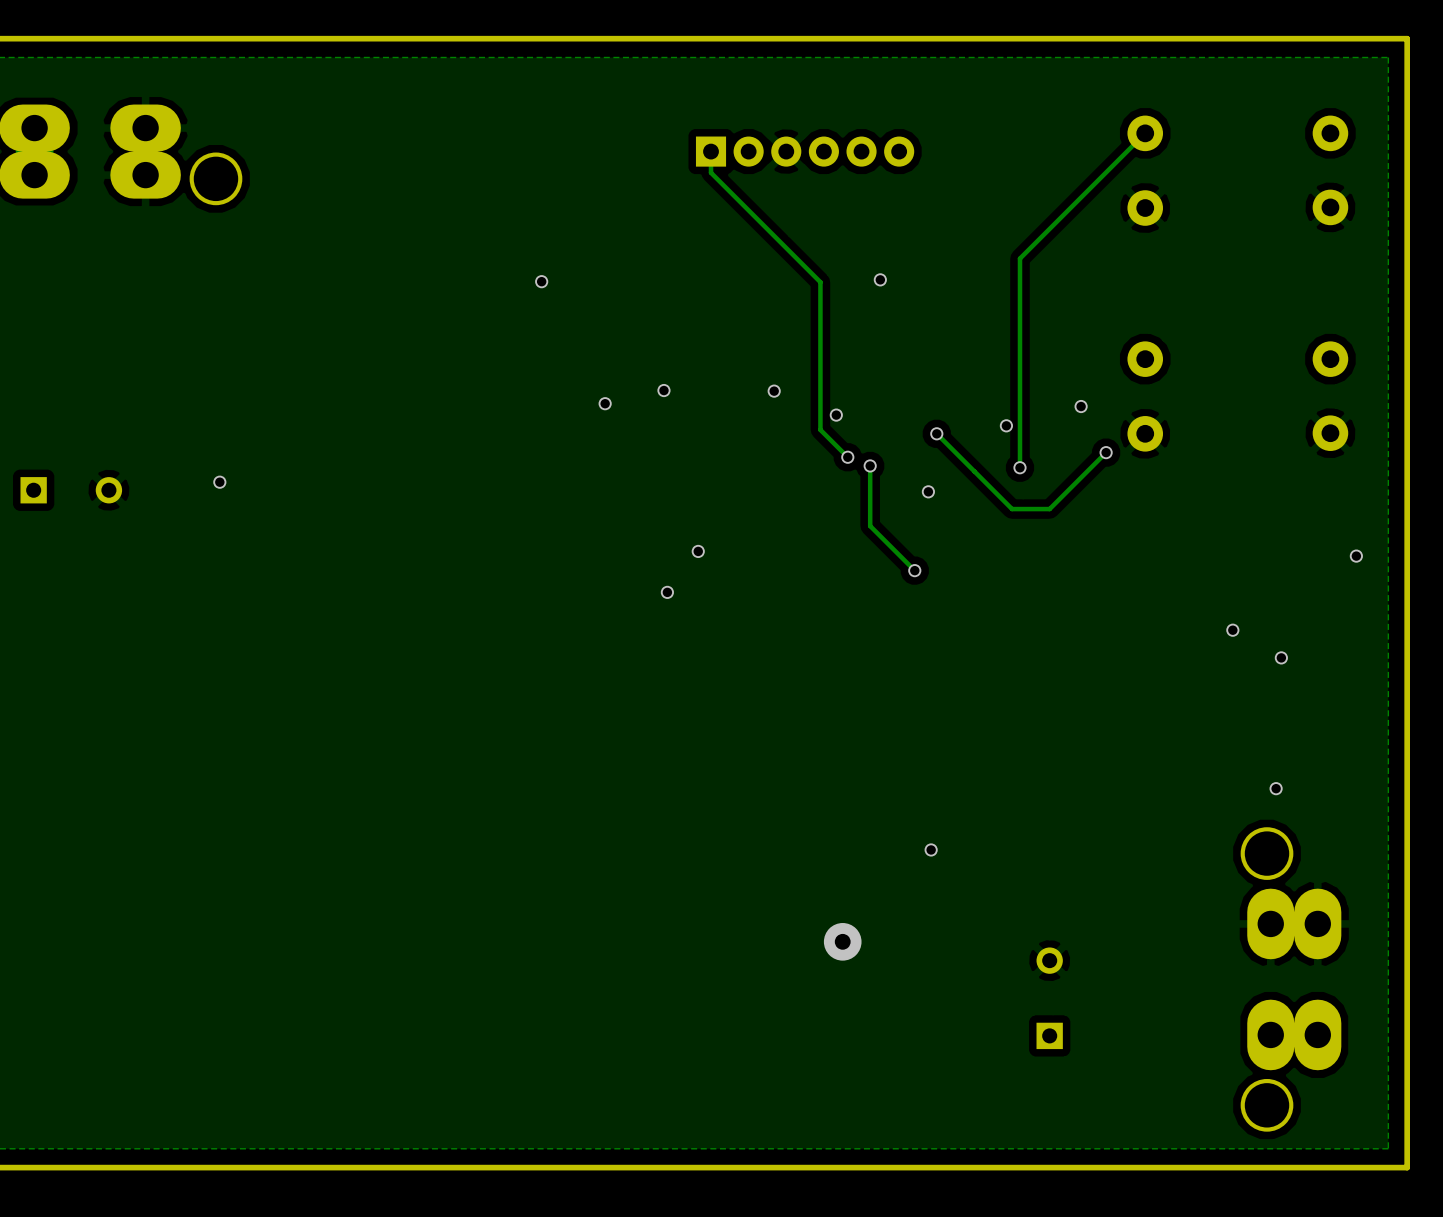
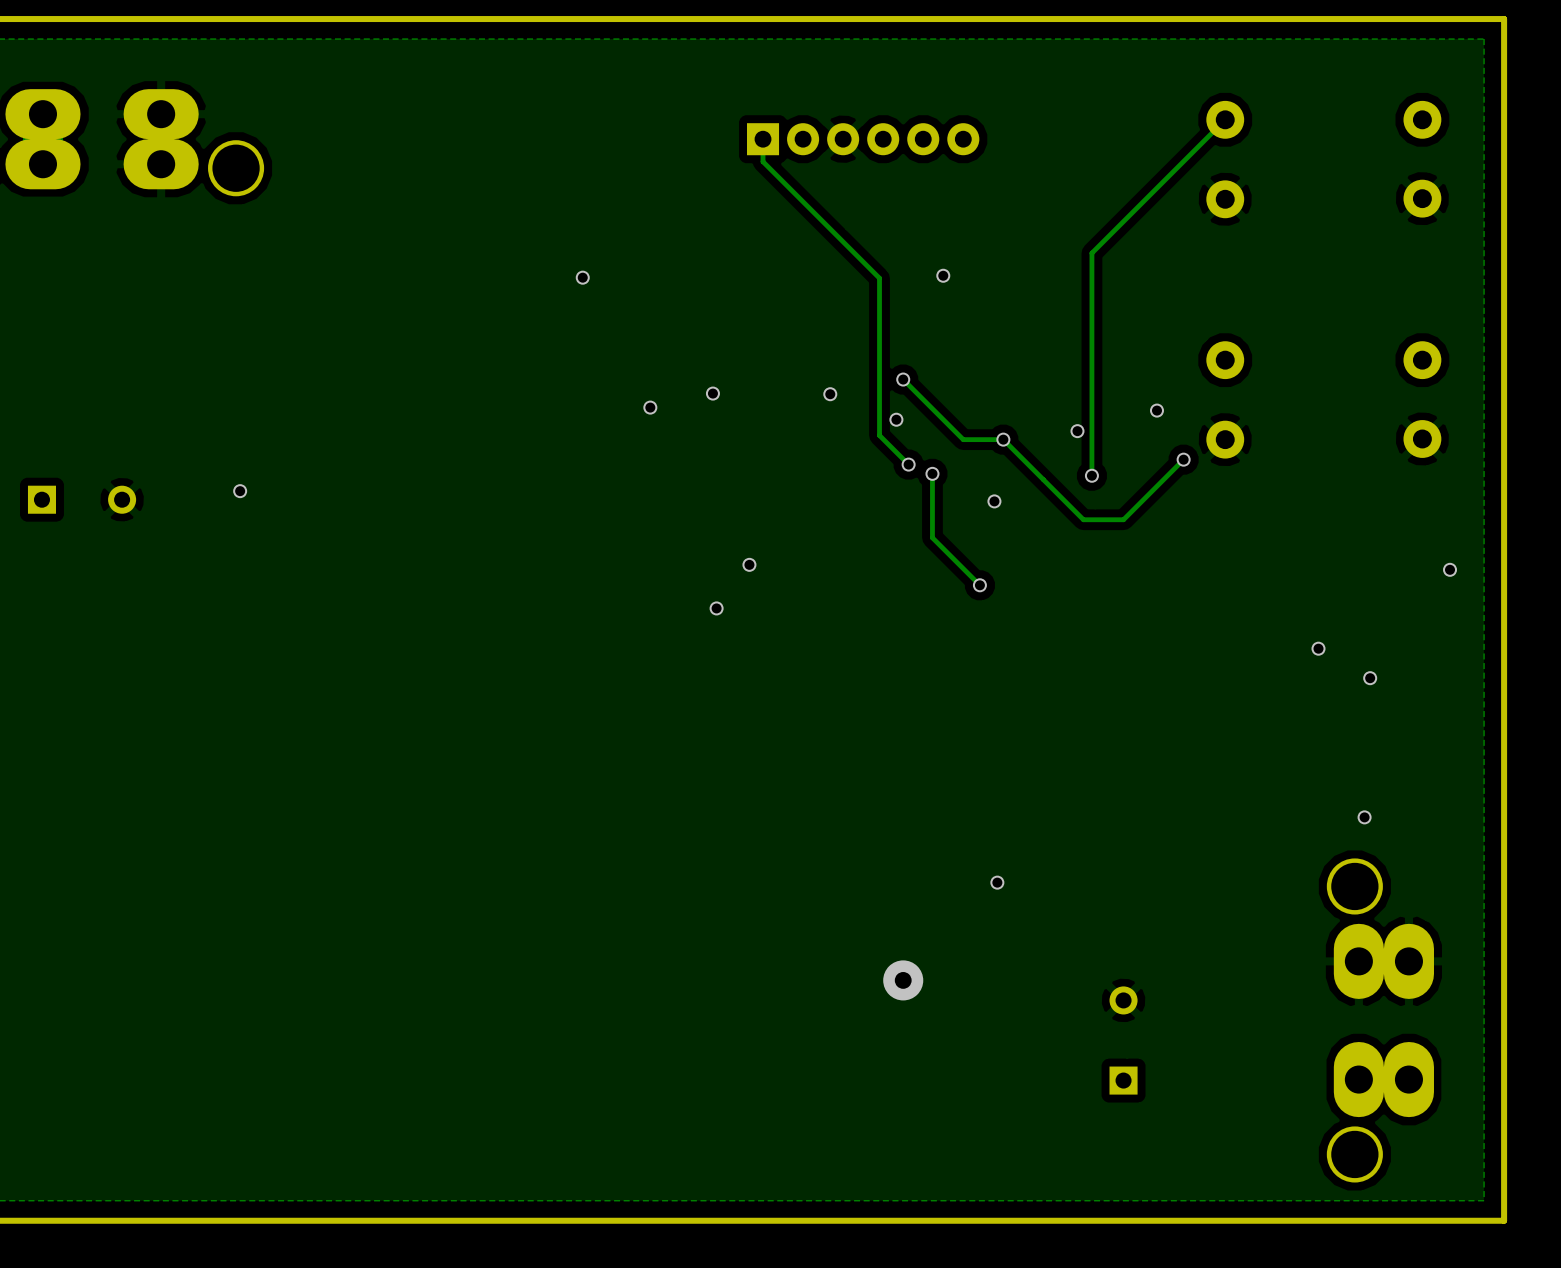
track: none -> (903, 379) (963, 439) (1003, 439)
via: none -> (903, 379)

